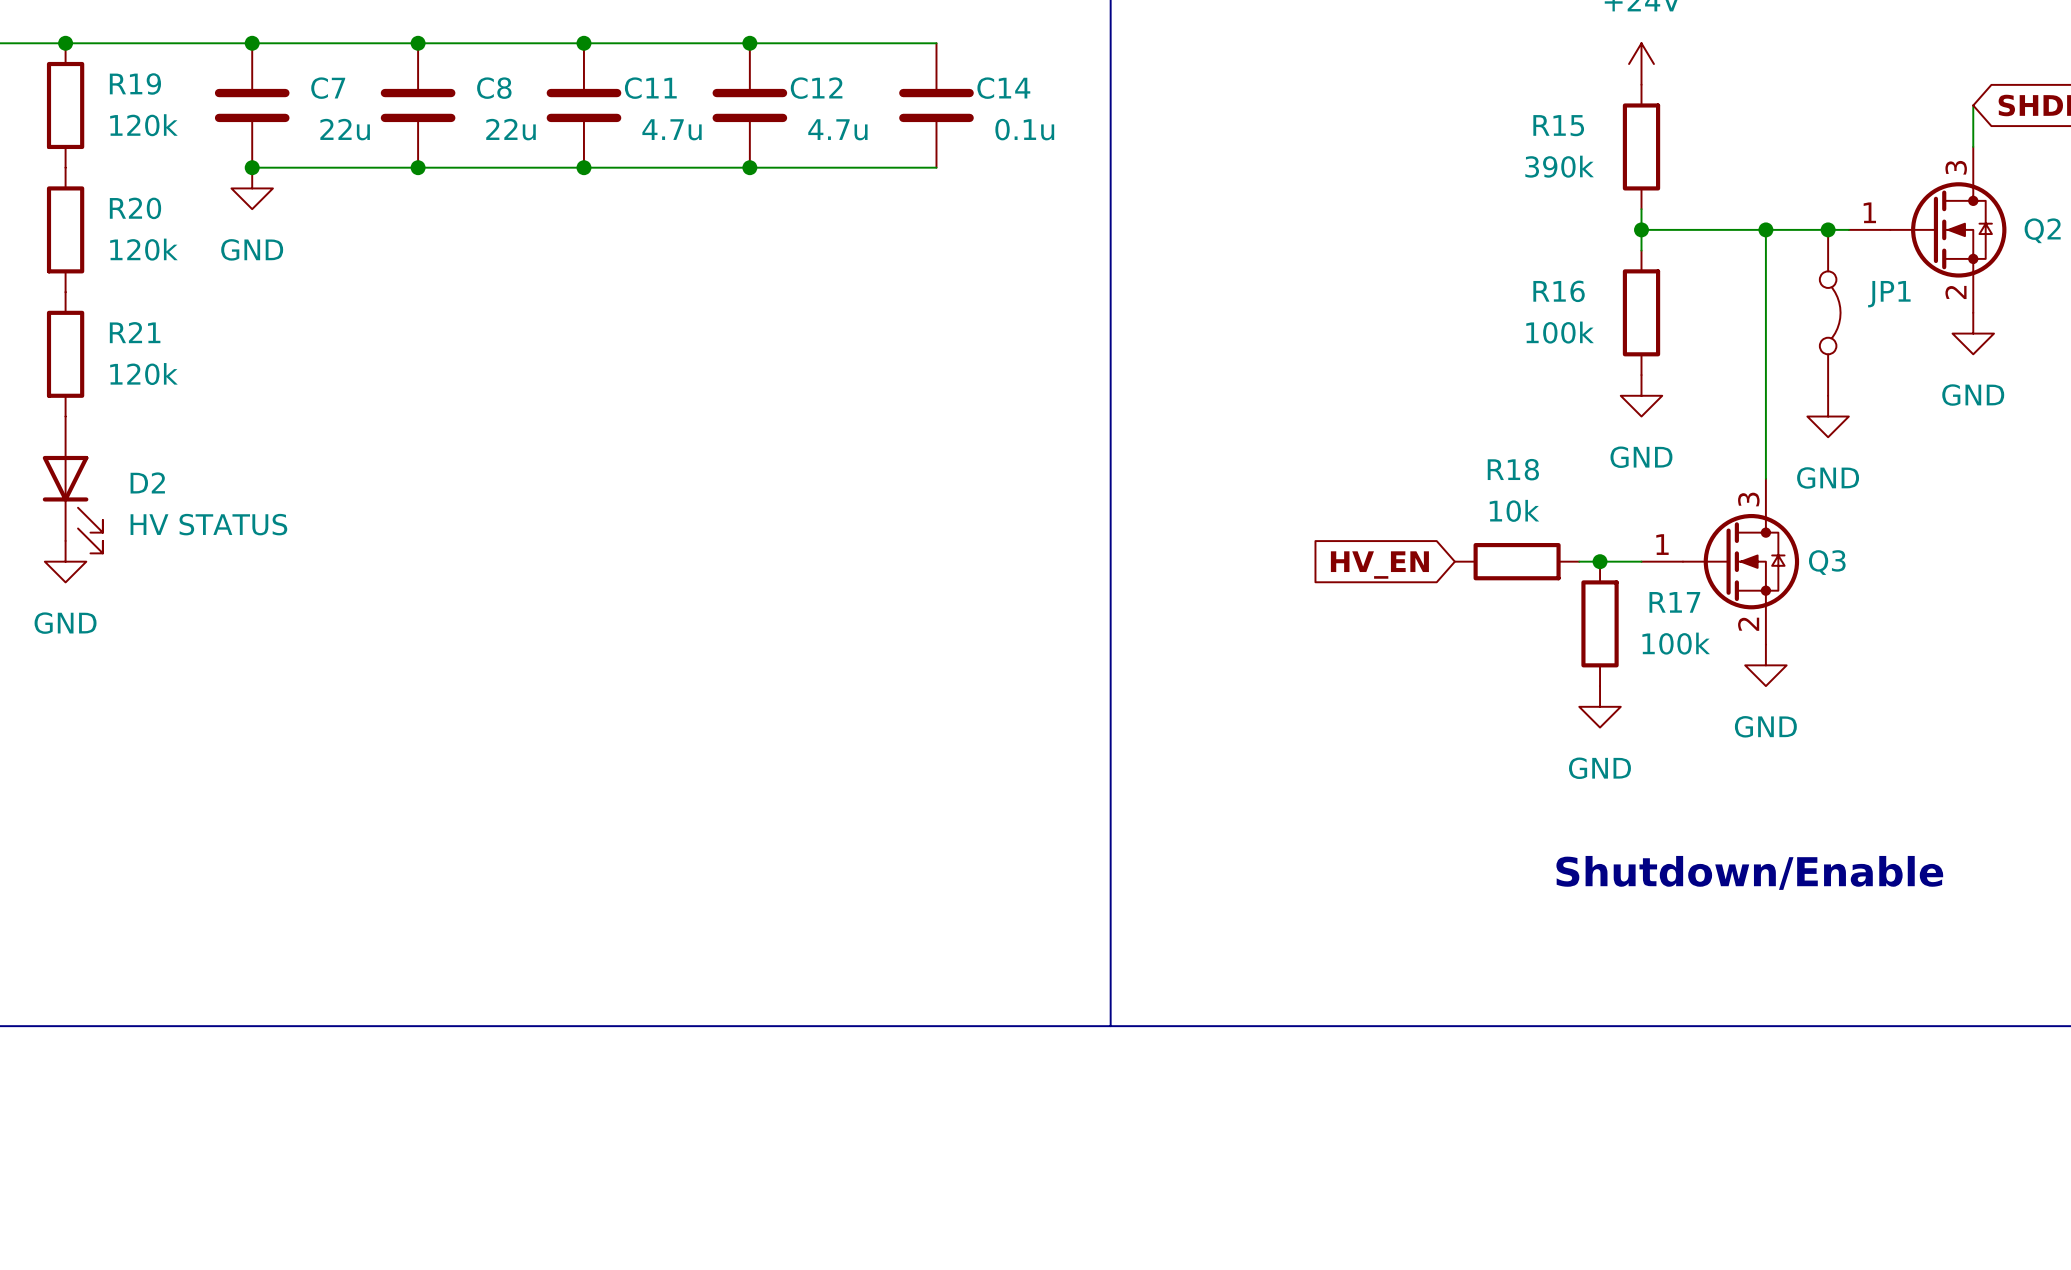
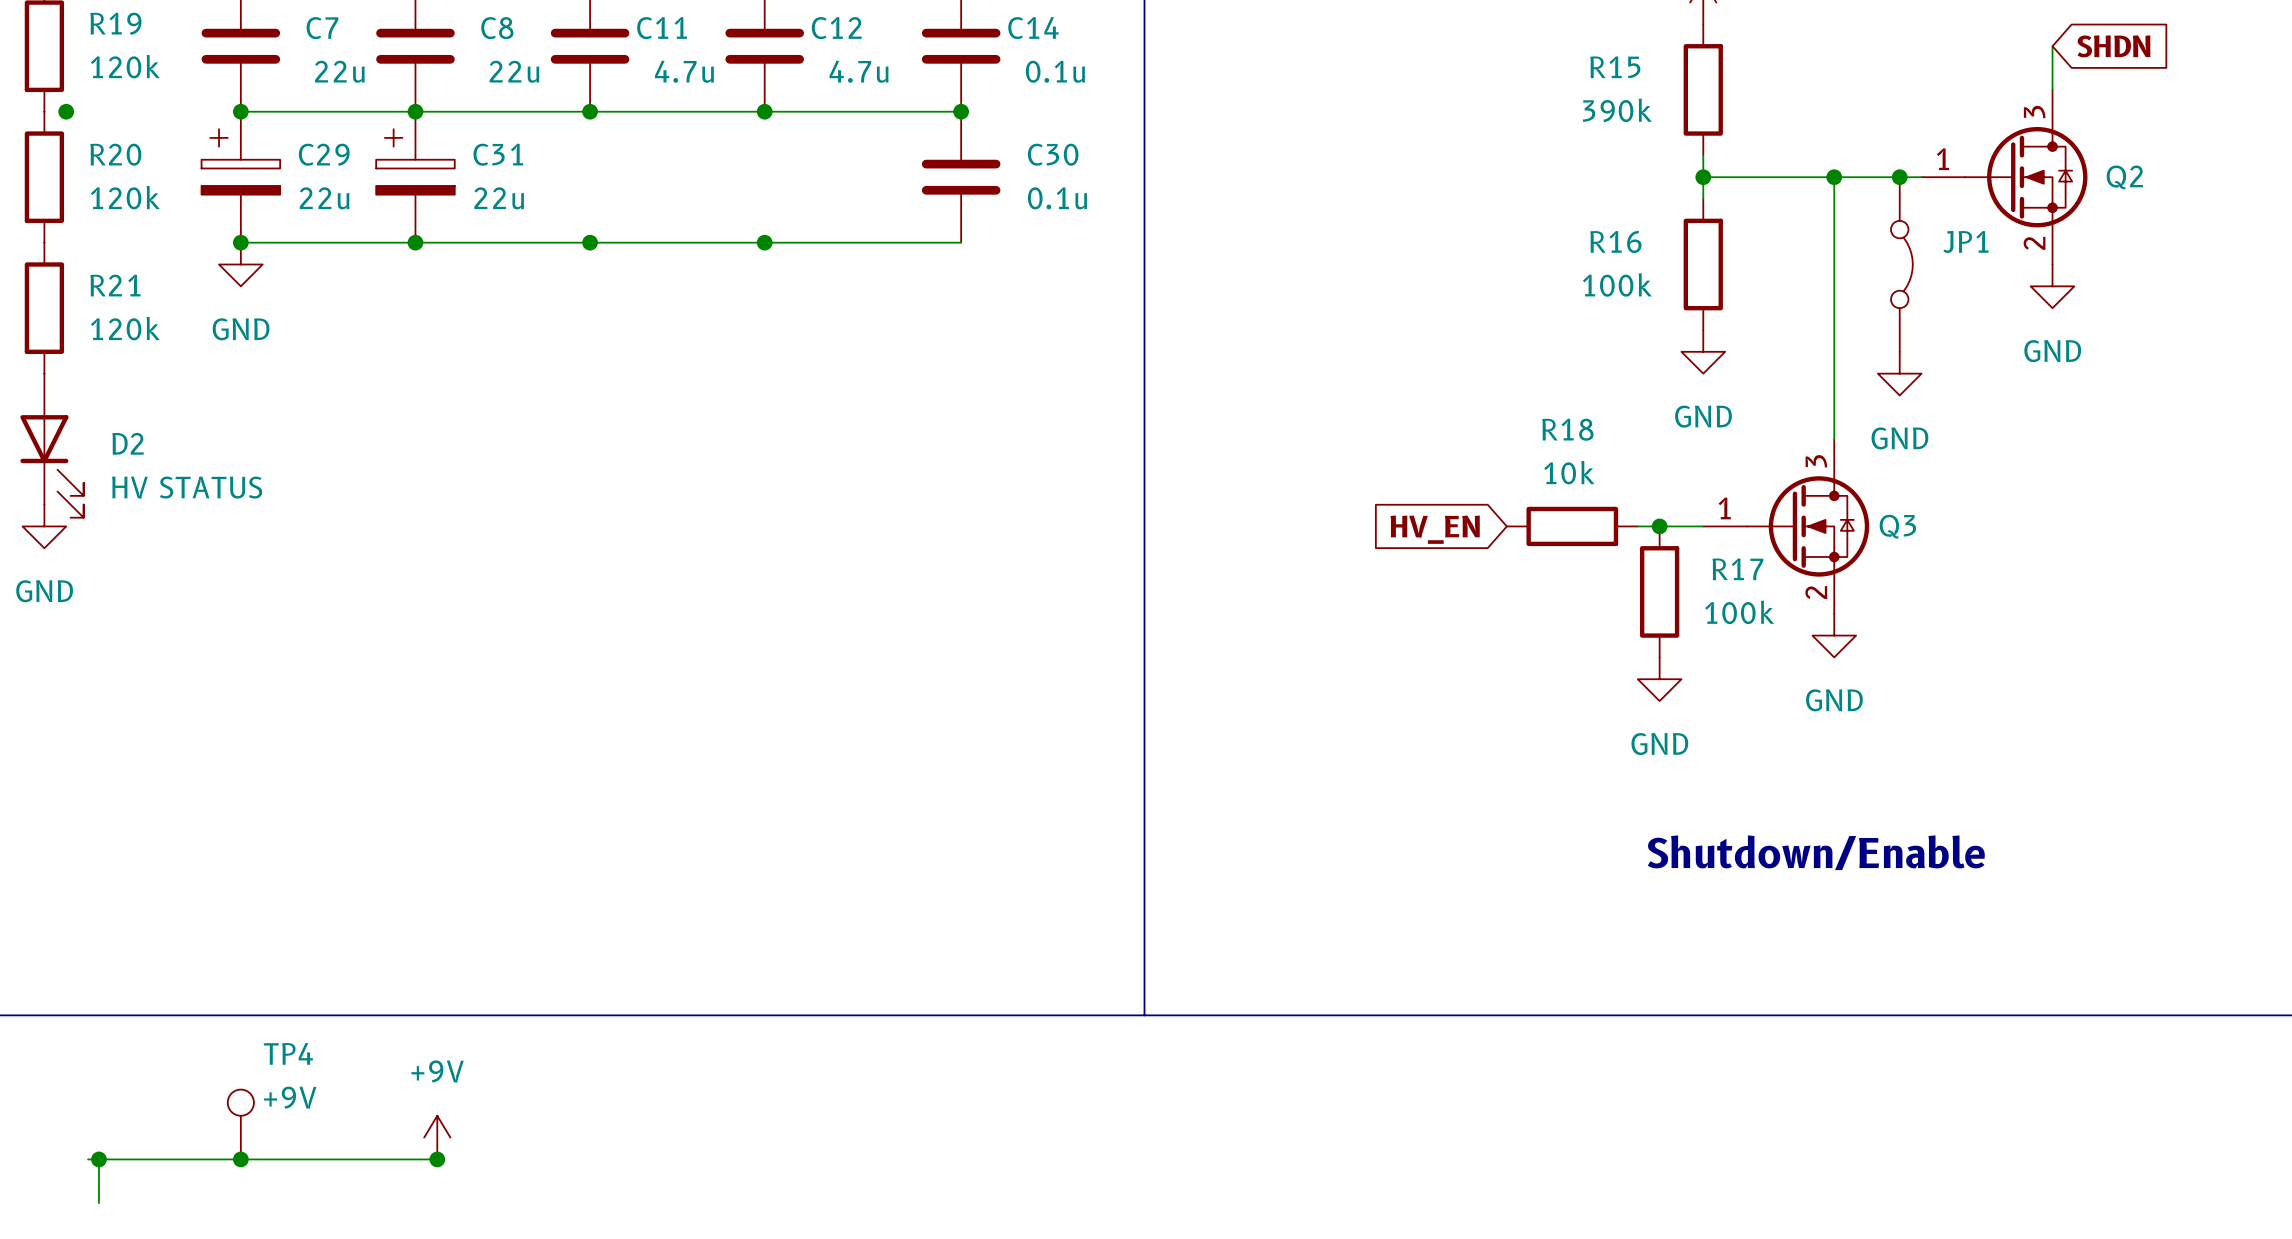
junction: none -> (66, 111)
junction: none -> (961, 111)
power symbol position: GND (252, 188) -> GND (240, 264)
C29: none -> 22u (240, 177)
C31: none -> 22u (415, 177)
C30: none -> 0.1u (961, 177)
wire: none -> (240, 242) (961, 242)
junction: none -> (240, 242)
junction: none -> (415, 242)
junction: none -> (590, 242)
junction: none -> (764, 242)
TP4: none -> +9V (240, 1124)
power symbol: none -> +9V (437, 1137)
wire: none -> (88, 1159) (437, 1159)
wire: none -> (98, 1159) (98, 1203)
junction: none -> (98, 1159)
junction: none -> (240, 1159)
junction: none -> (437, 1159)

